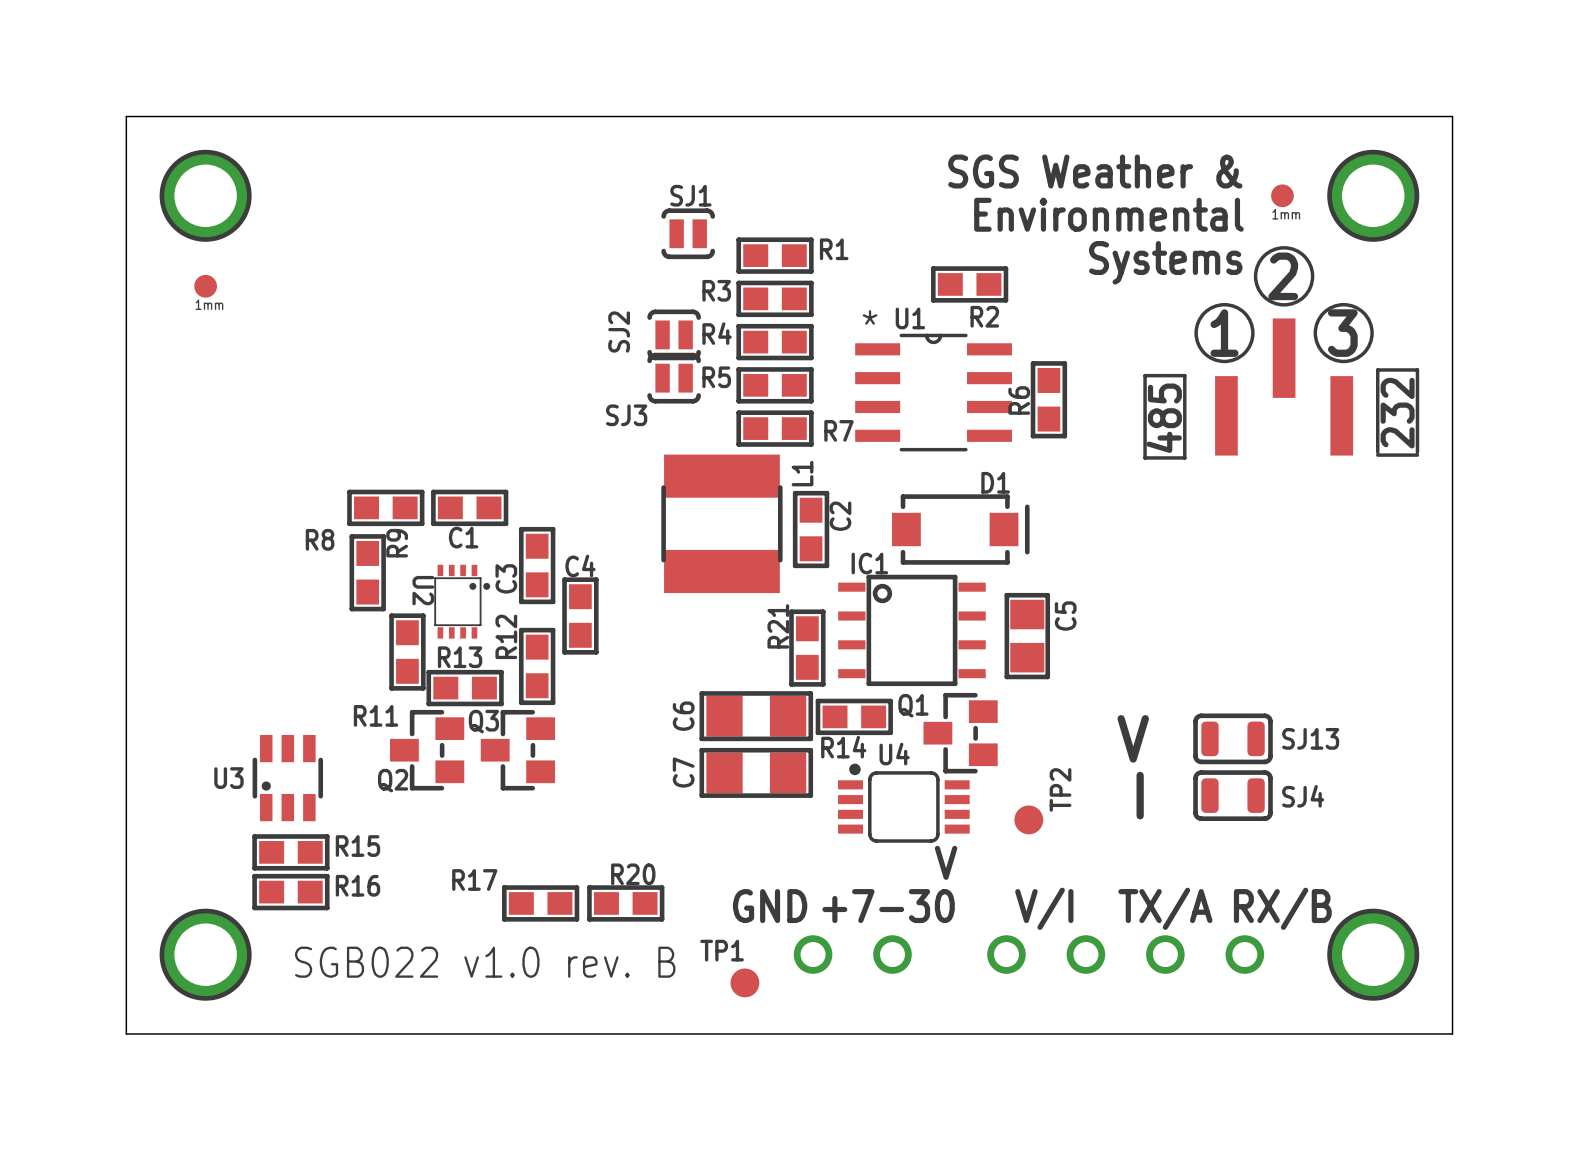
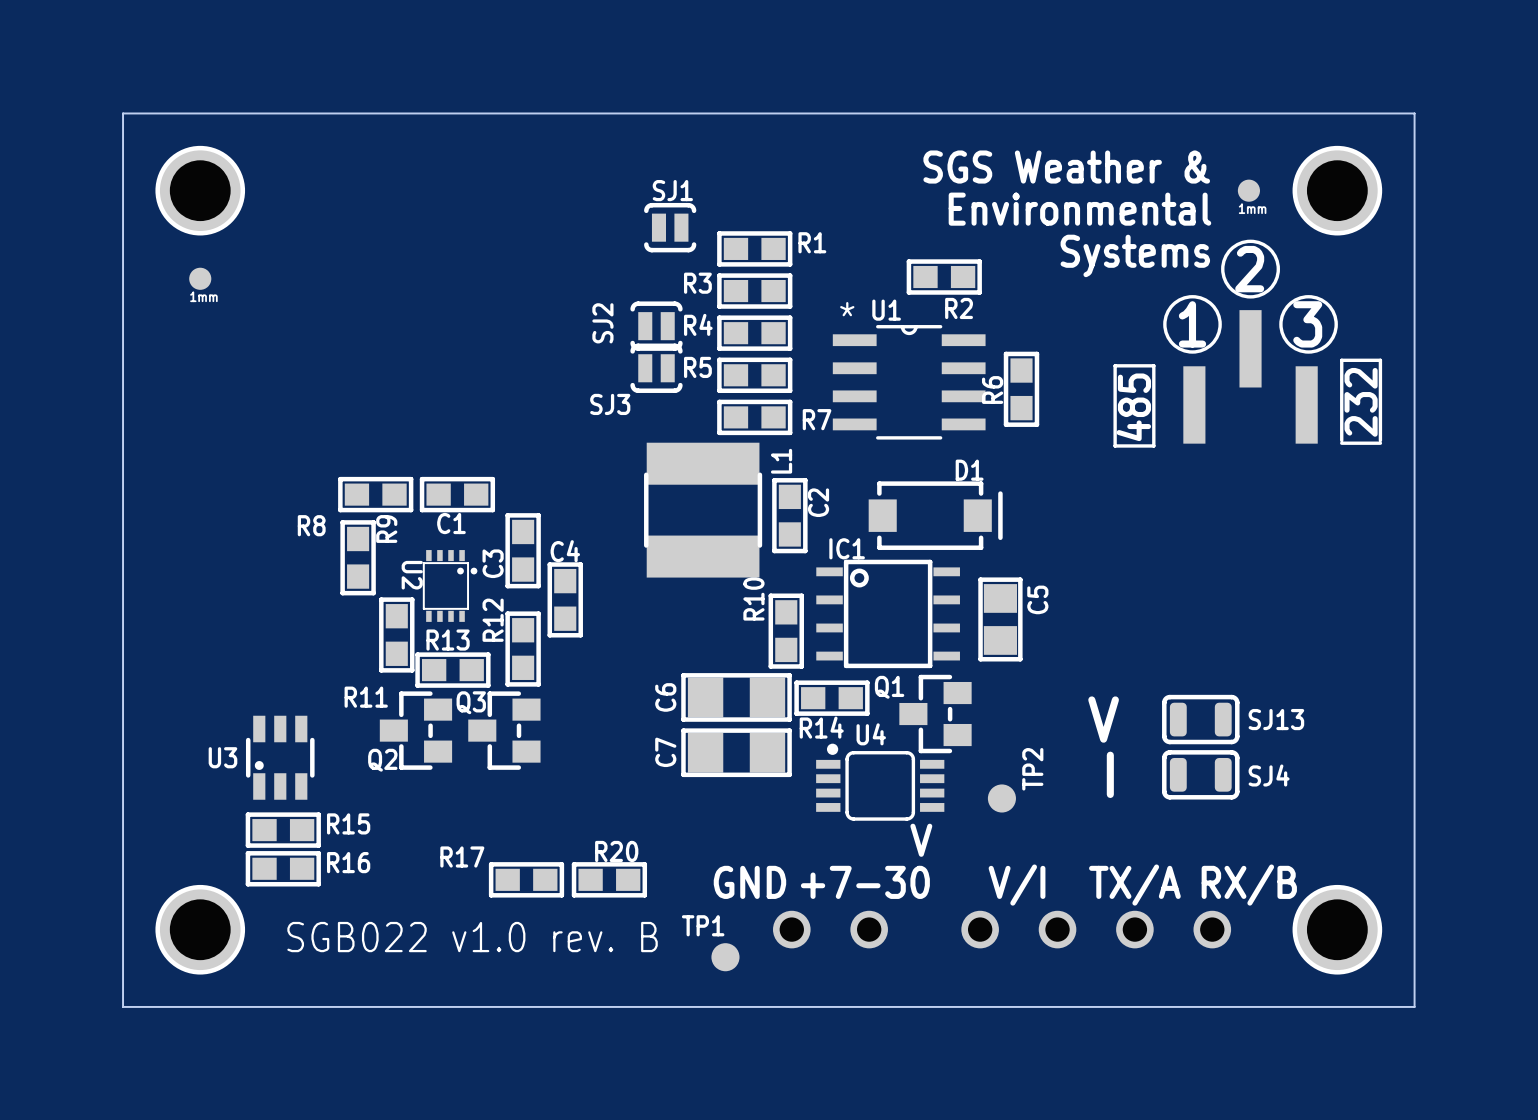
R21 name: R21 (778, 626) -> R10 (753, 598)

